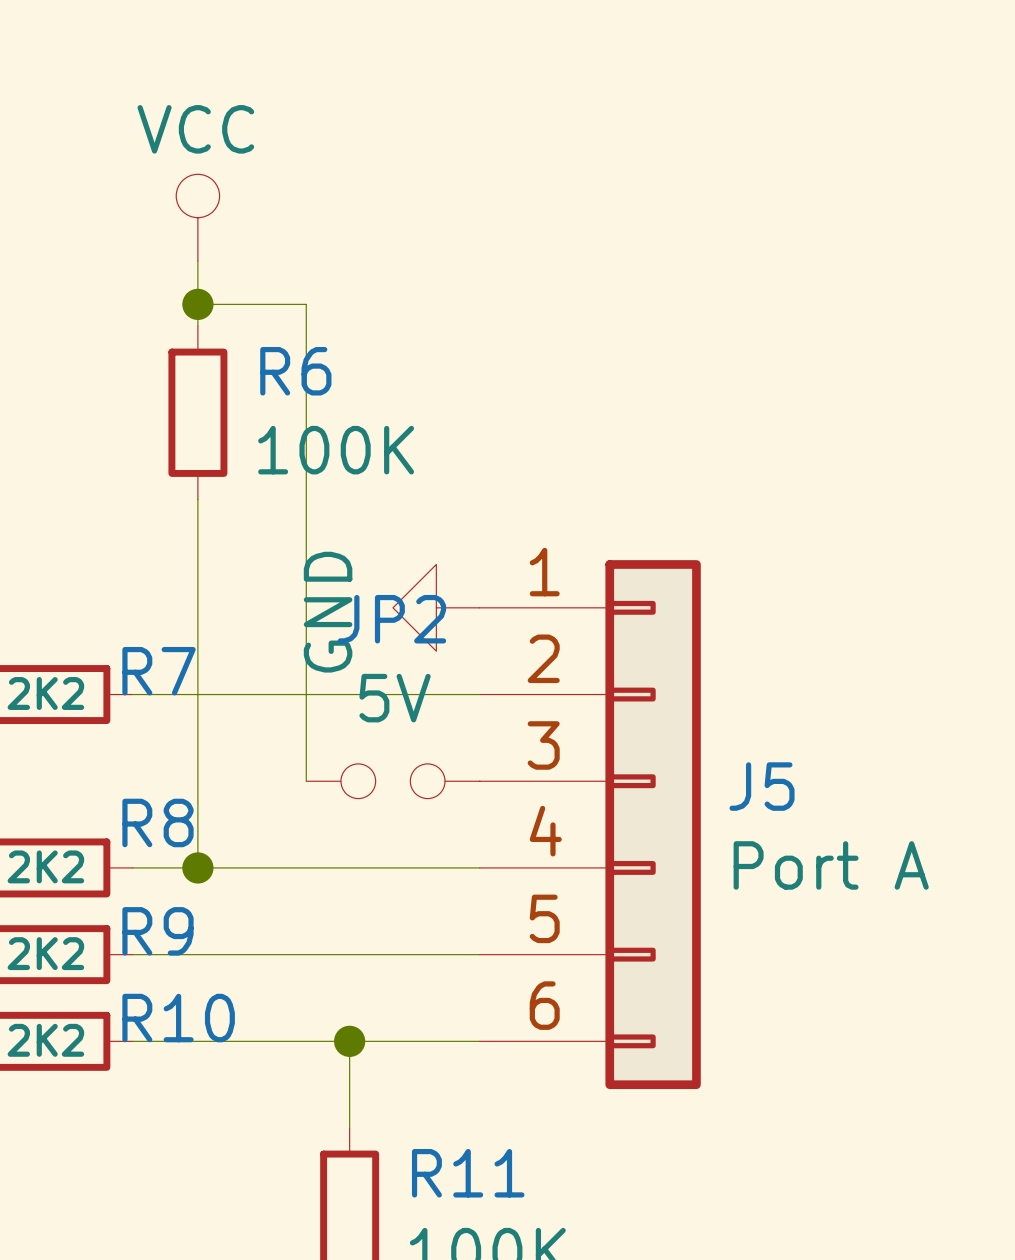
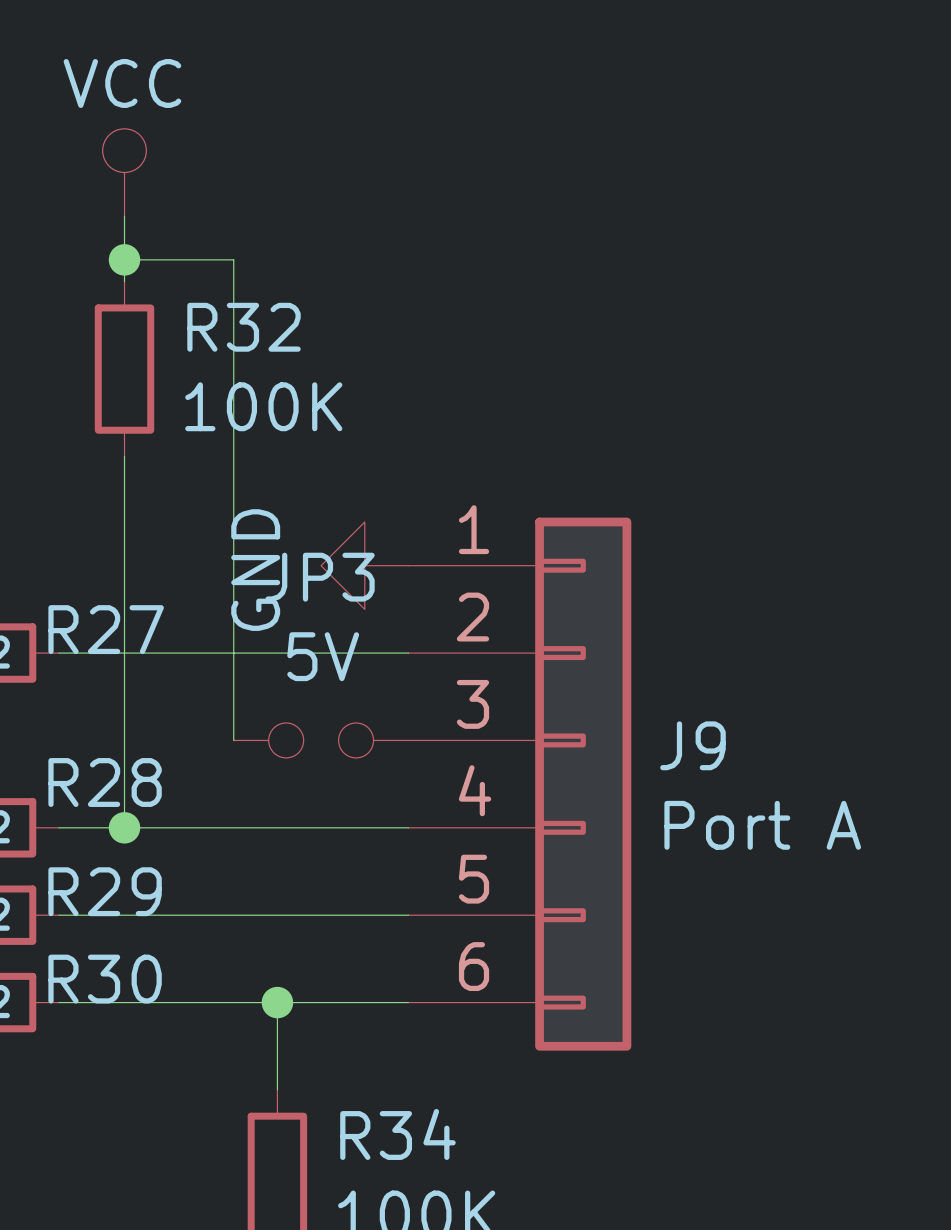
R6 name: R6 (295, 371) -> R32 (244, 327)
JP2 name: JP2 (391, 619) -> JP3 (320, 577)
R7 name: R7 (159, 671) -> R27 (106, 629)
J5 name: J5 (762, 786) -> J9 (693, 745)
R8 name: R8 (157, 822) -> R28 (105, 782)
R9 name: R9 (157, 931) -> R29 (105, 891)
R10 name: R10 (178, 1018) -> R30 (105, 979)
R11 name: R11 (468, 1173) -> R34 (397, 1134)

